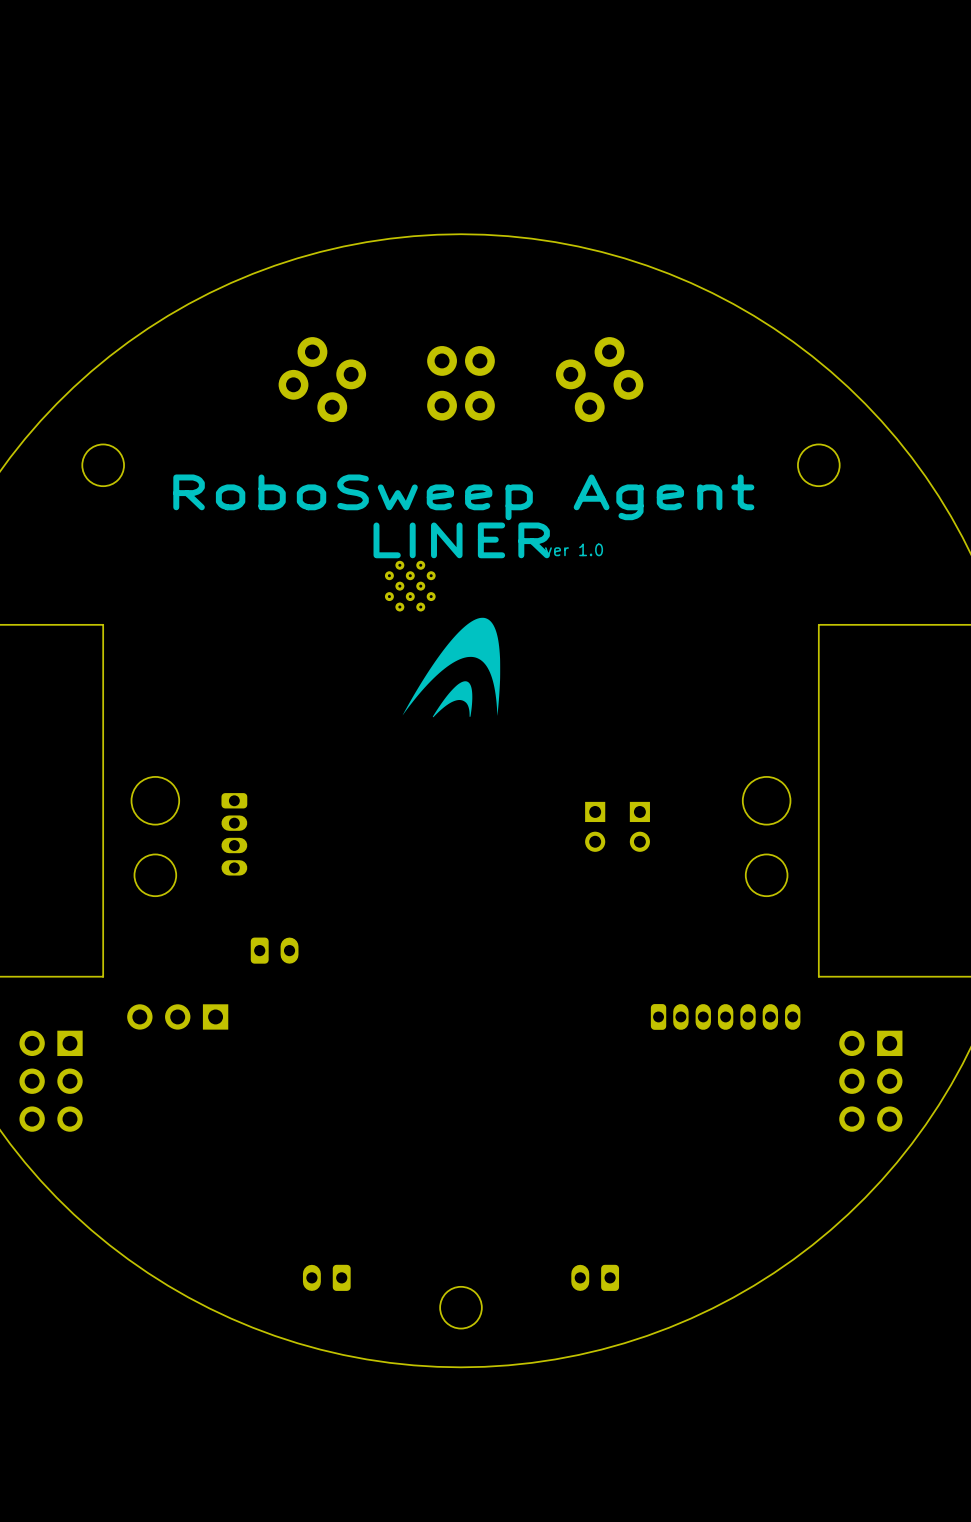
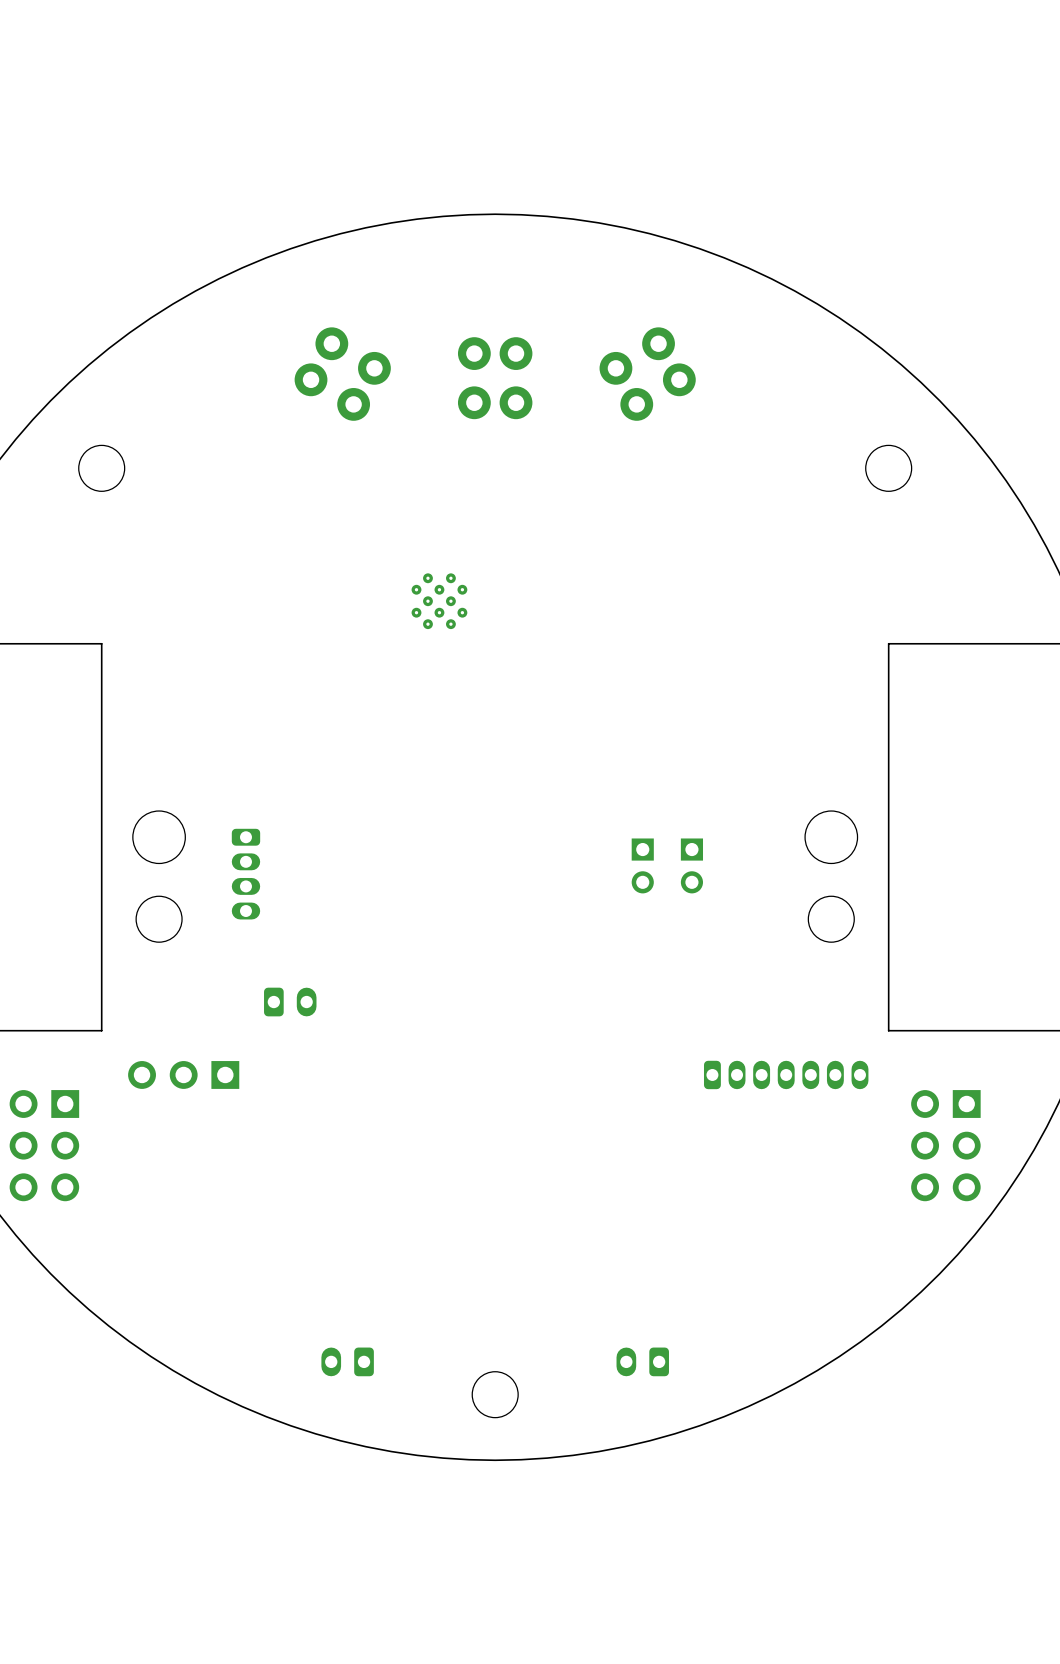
text: RoboSweep Agent (463, 497) -> none
text: LINER (461, 540) -> none
text: ver 1.0 (574, 549) -> none
drawing: [402, 617, 501, 718] -> none

